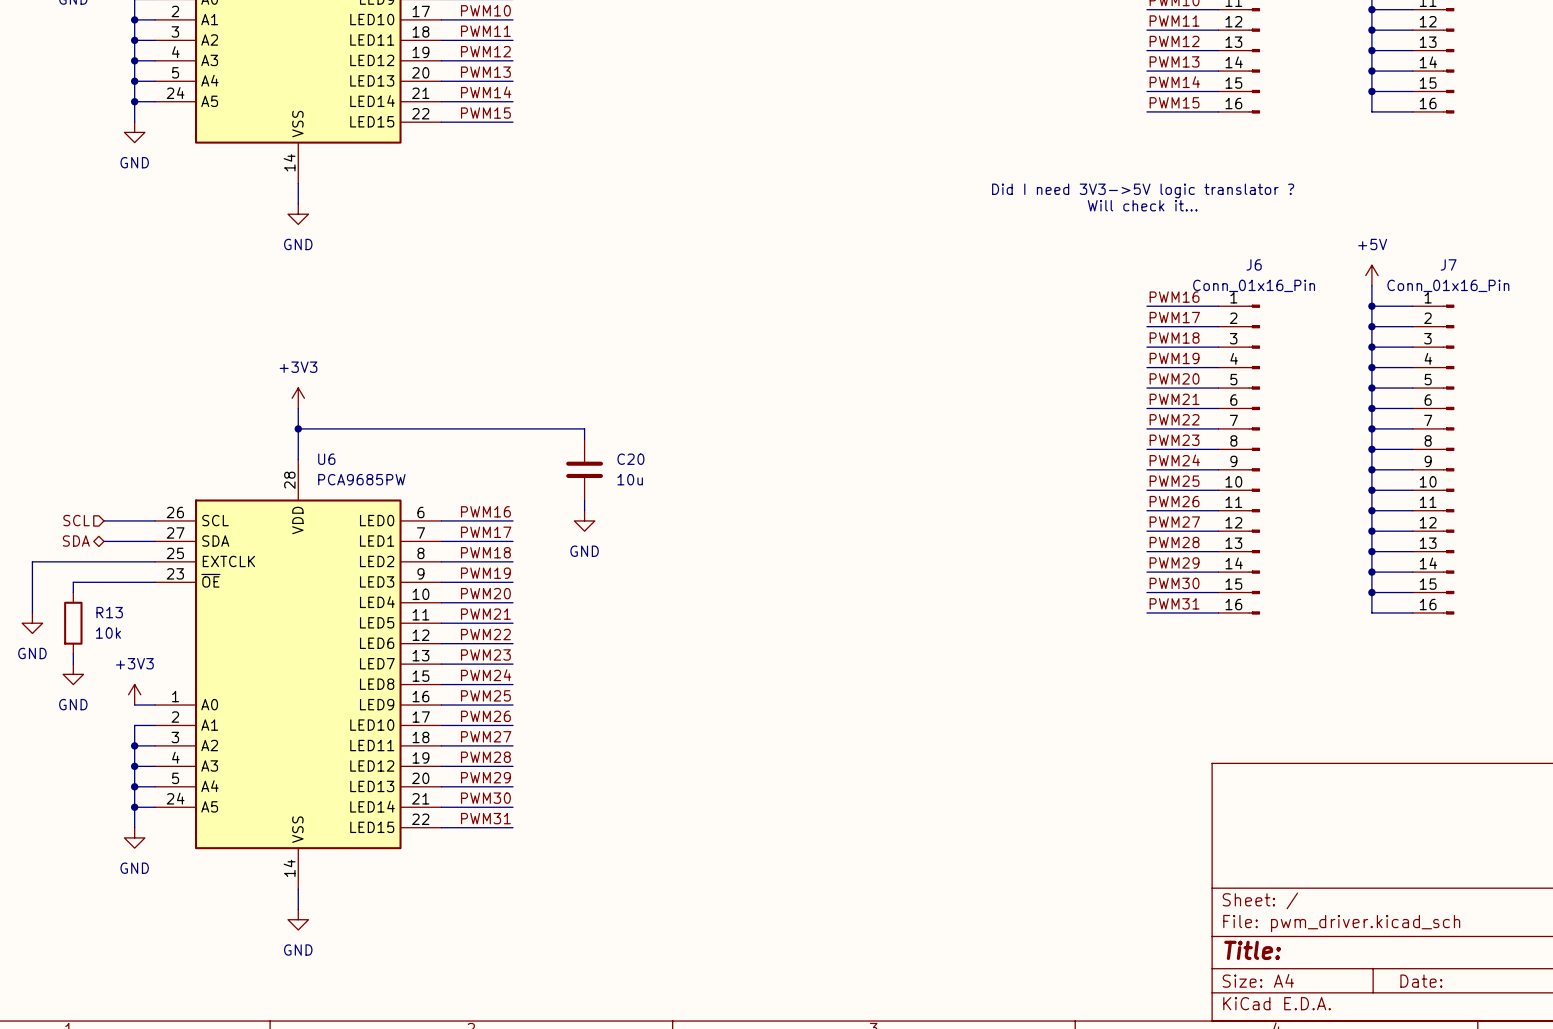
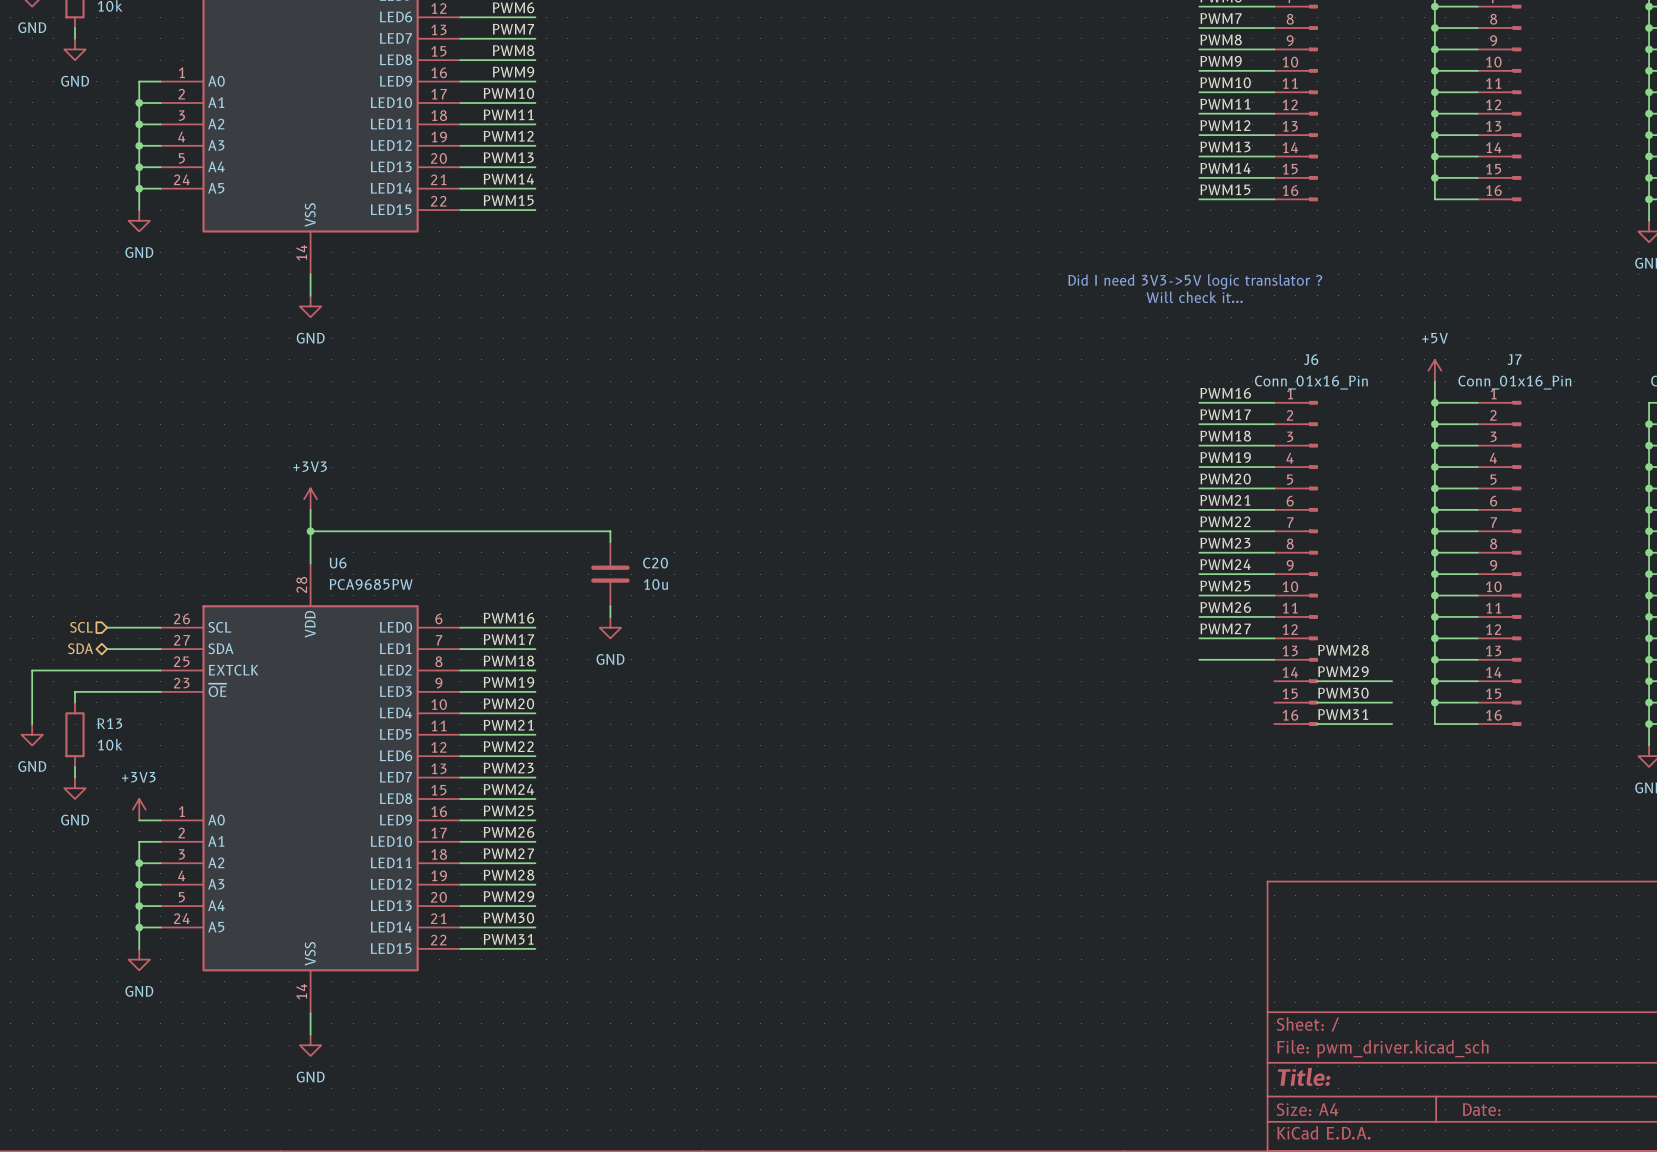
label position: PWM28 (1174, 542) -> PWM28 (1343, 650)
label position: PWM29 (1174, 562) -> PWM29 (1343, 671)
wire: (1146, 572) (1218, 572) -> (1317, 681) (1392, 681)
label position: PWM30 (1174, 583) -> PWM30 (1343, 693)
wire: (1146, 592) (1218, 592) -> (1317, 702) (1392, 702)
label position: PWM31 (1174, 603) -> PWM31 (1343, 714)
wire: (1146, 612) (1218, 612) -> (1317, 724) (1392, 724)

